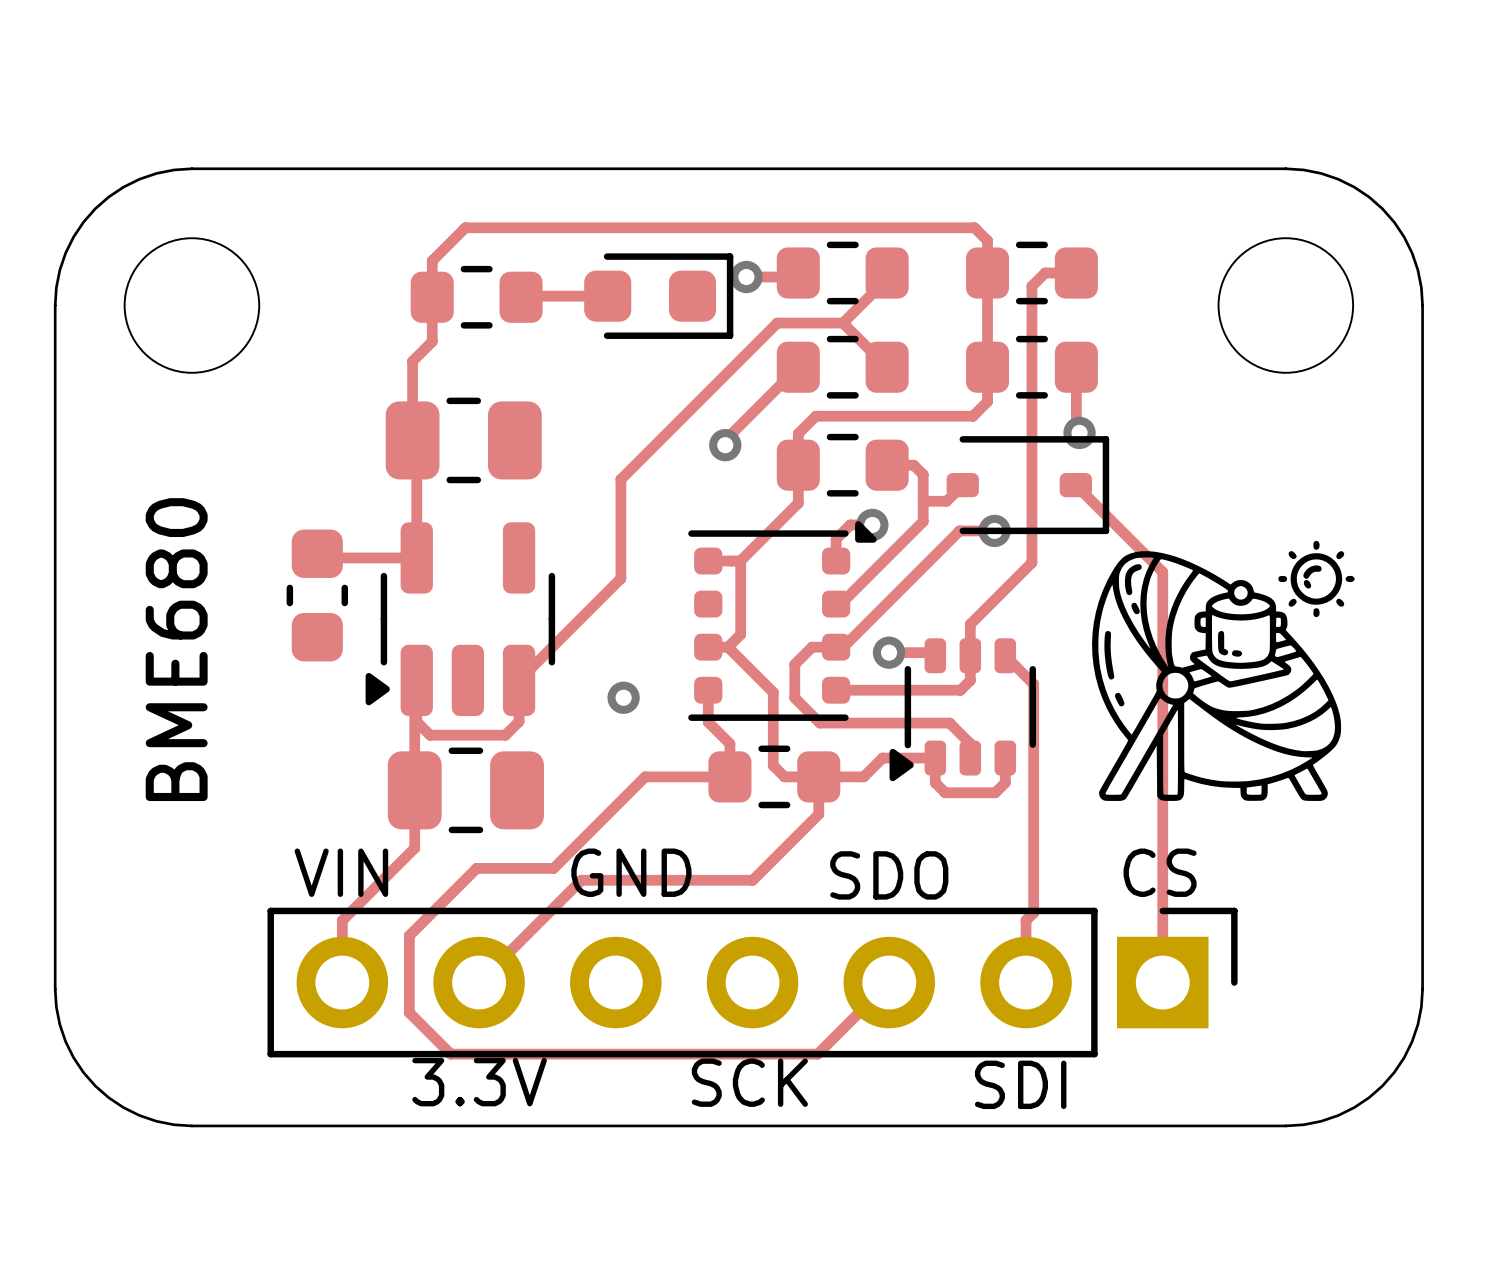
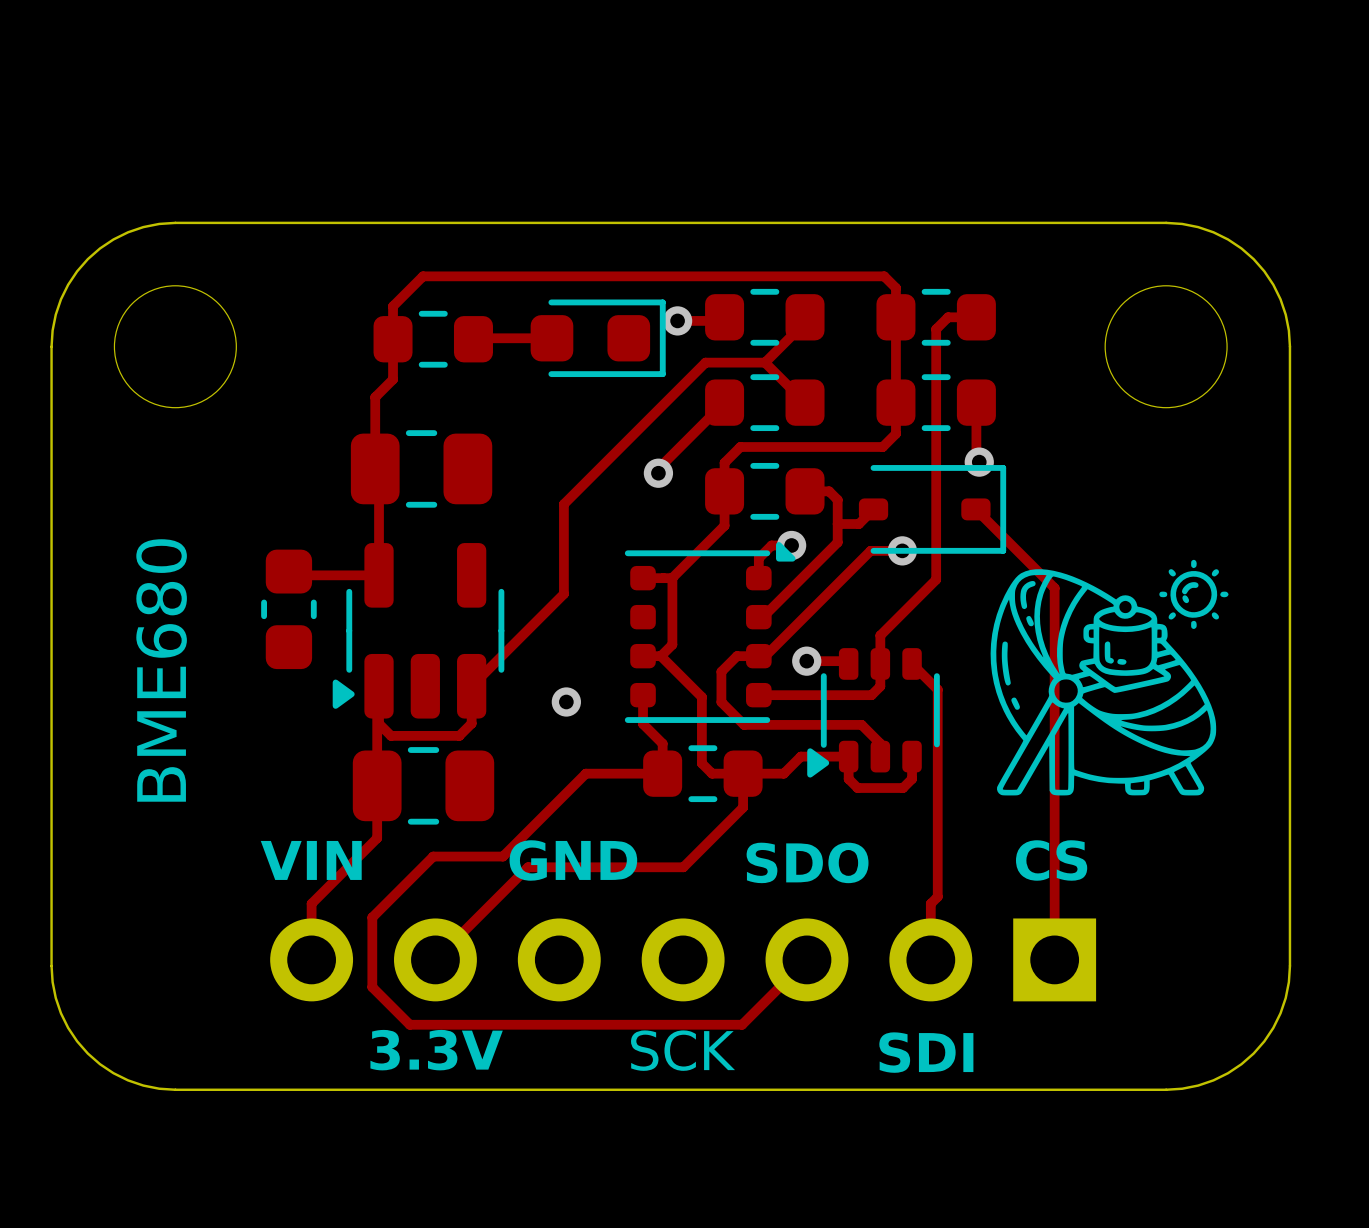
part side: top (752, 982) -> bottom (683, 959)

